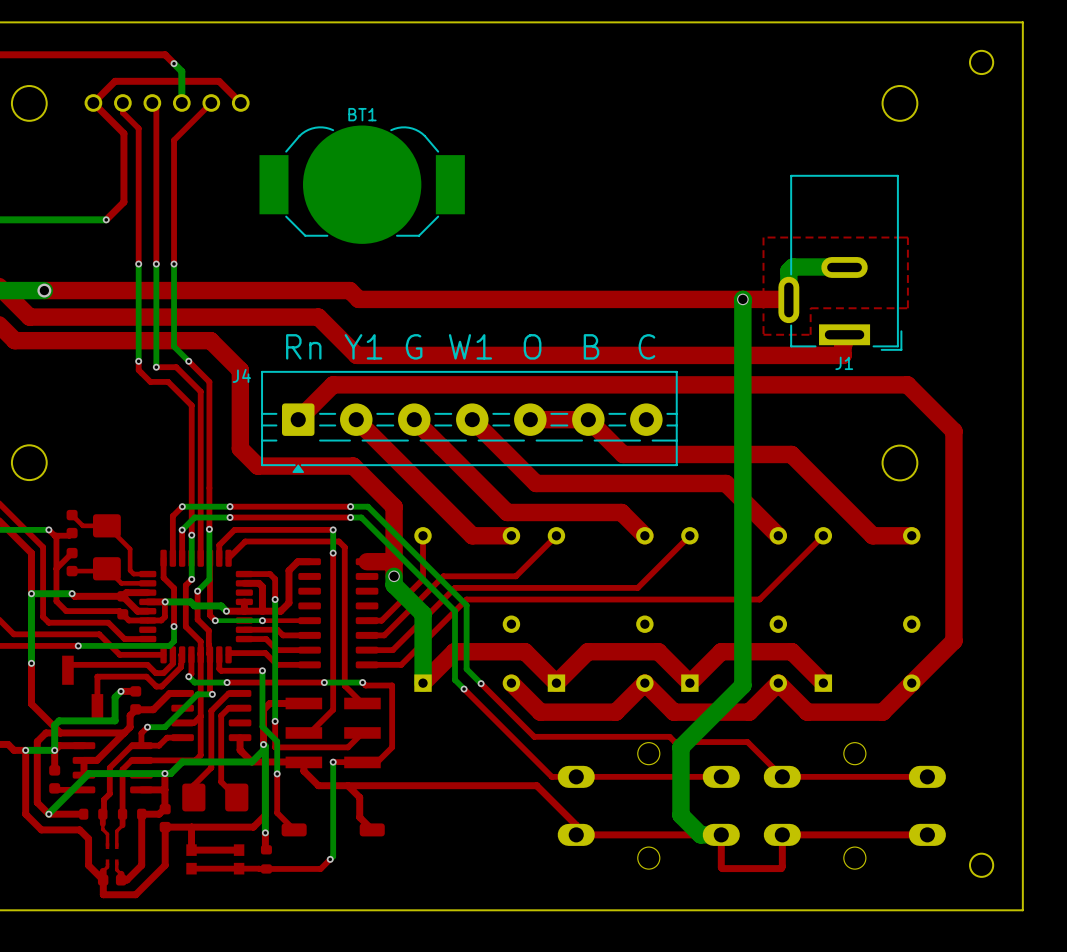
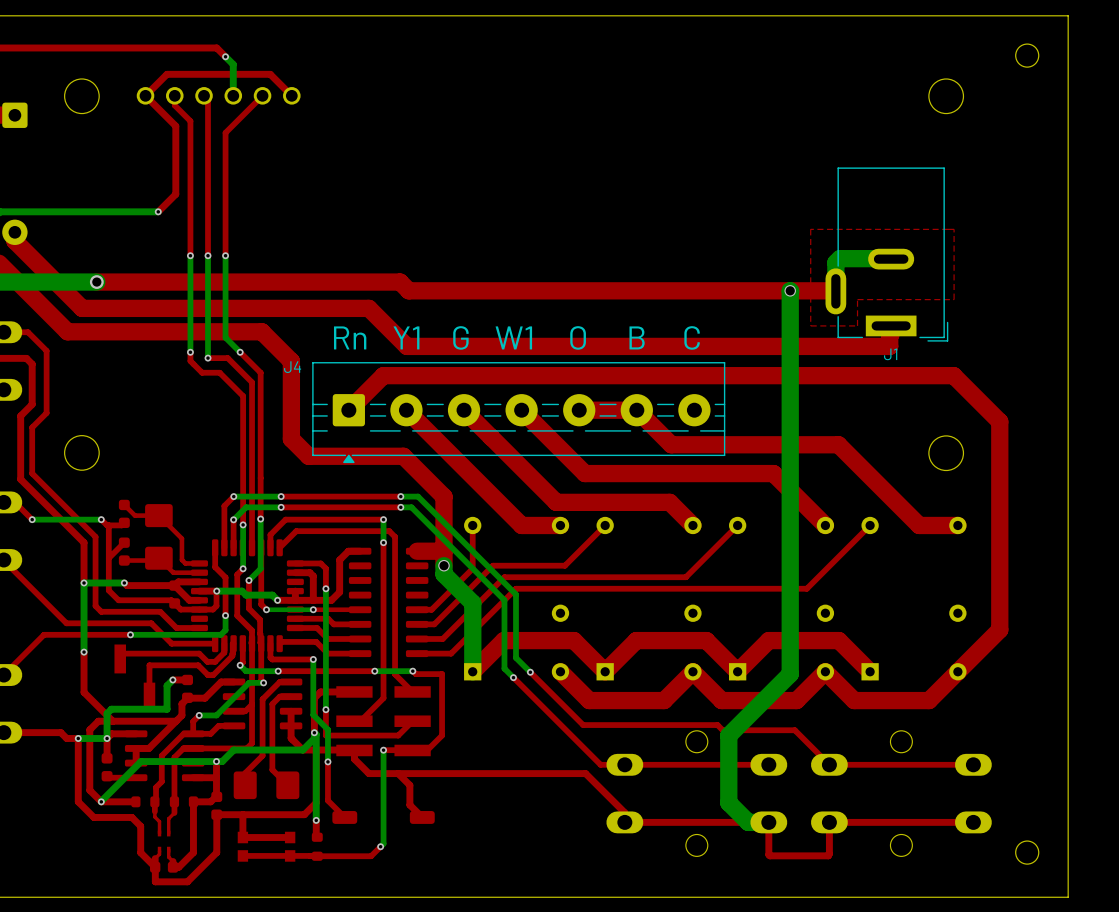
BT1: (362, 184) -> none
top track: none -> (291, 711) (291, 725)

